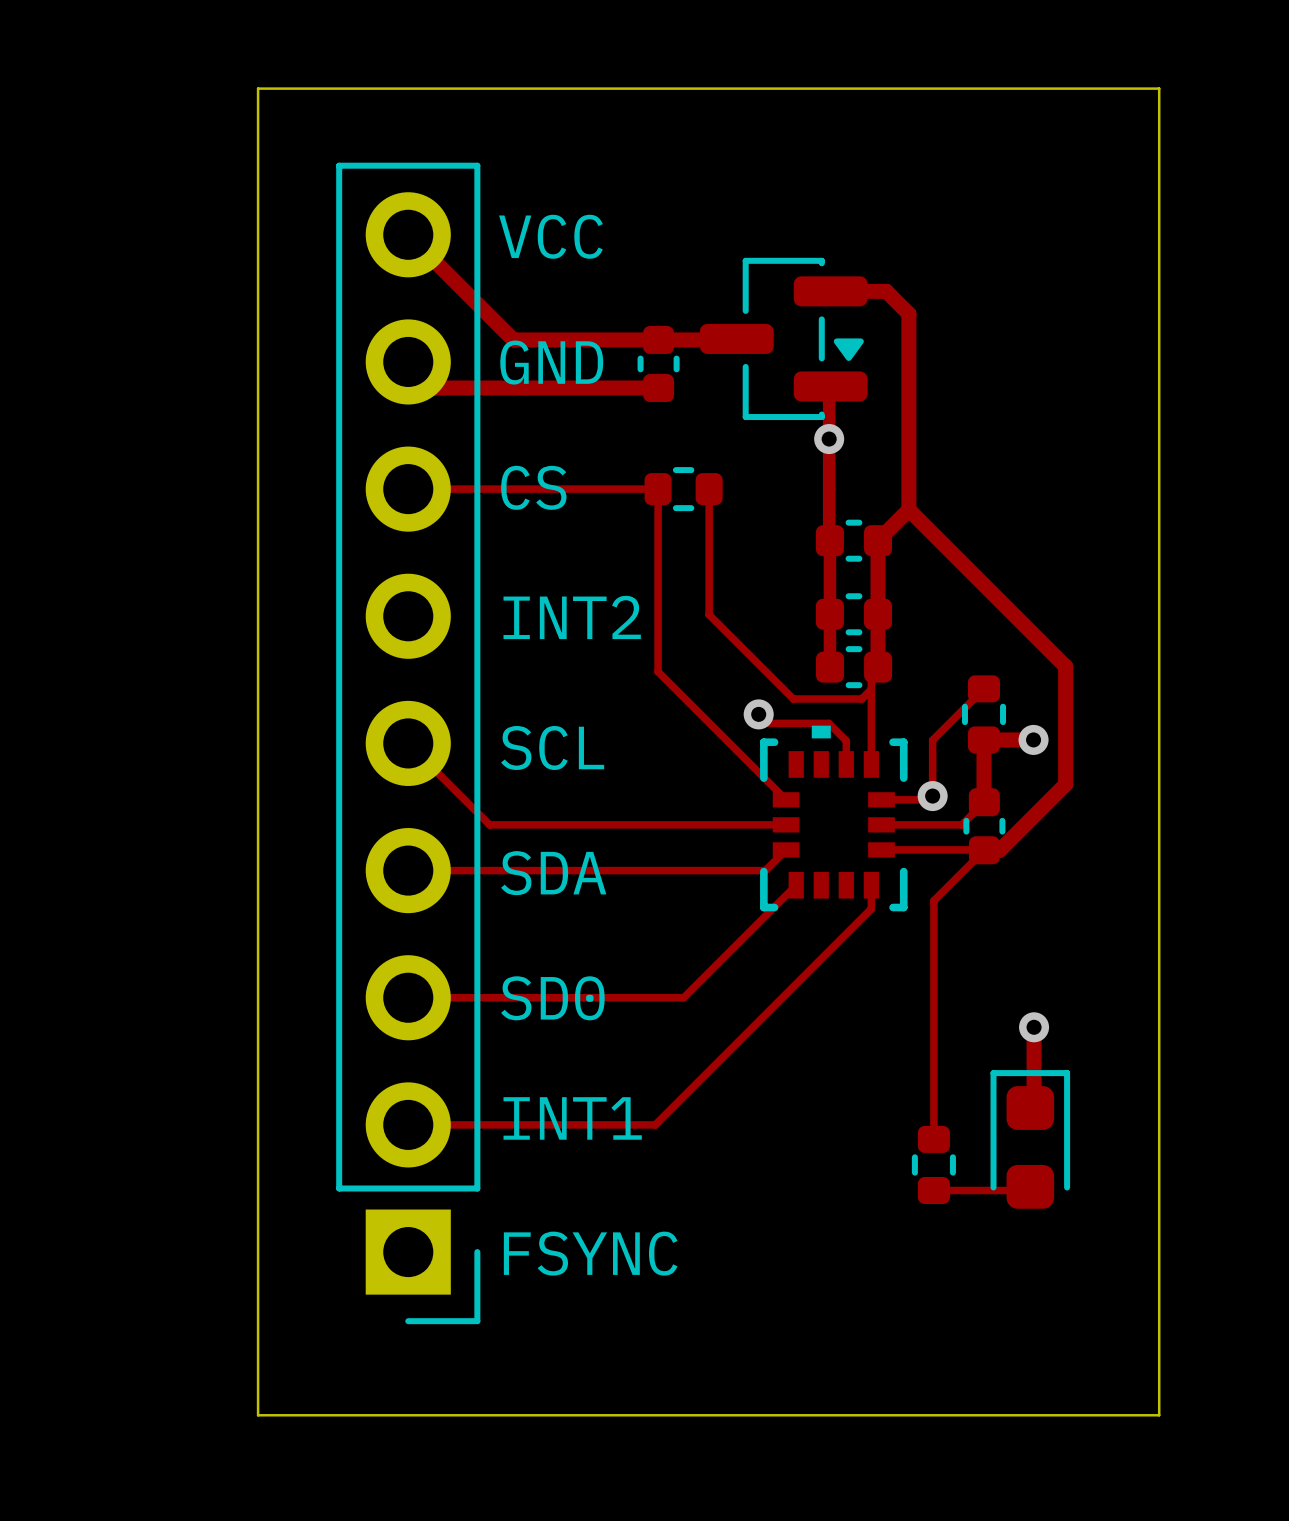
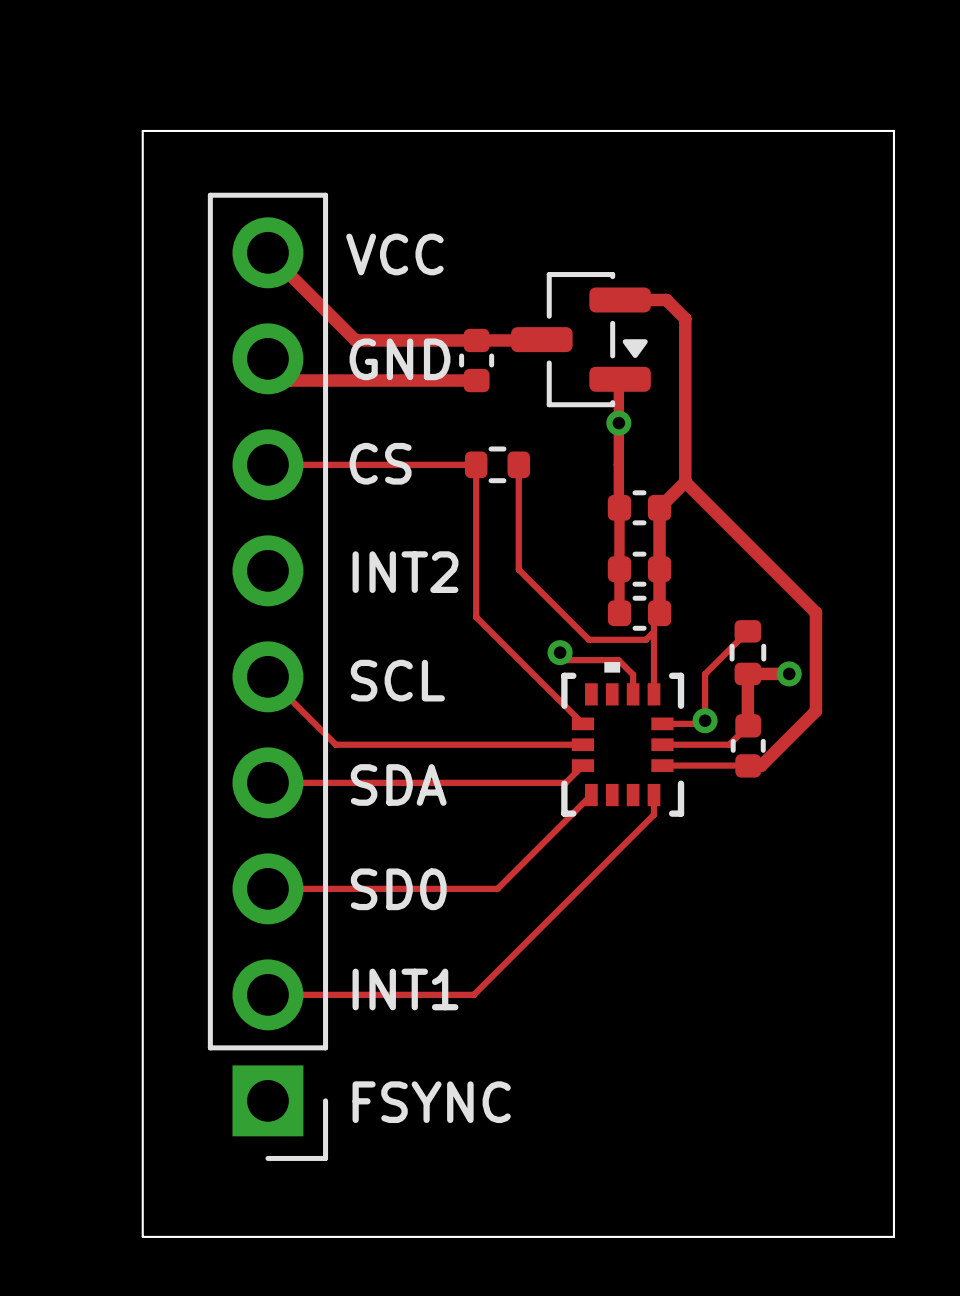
track: (984, 850) (933, 900) (933, 1138) -> none
track: (1034, 1027) (1034, 1104) (1030, 1108) -> none
via: (1034, 1027) -> none
part: (1030, 1139) -> none
part: (933, 1164) -> none
track: (1030, 1186) (1026, 1190) (933, 1190) -> none

